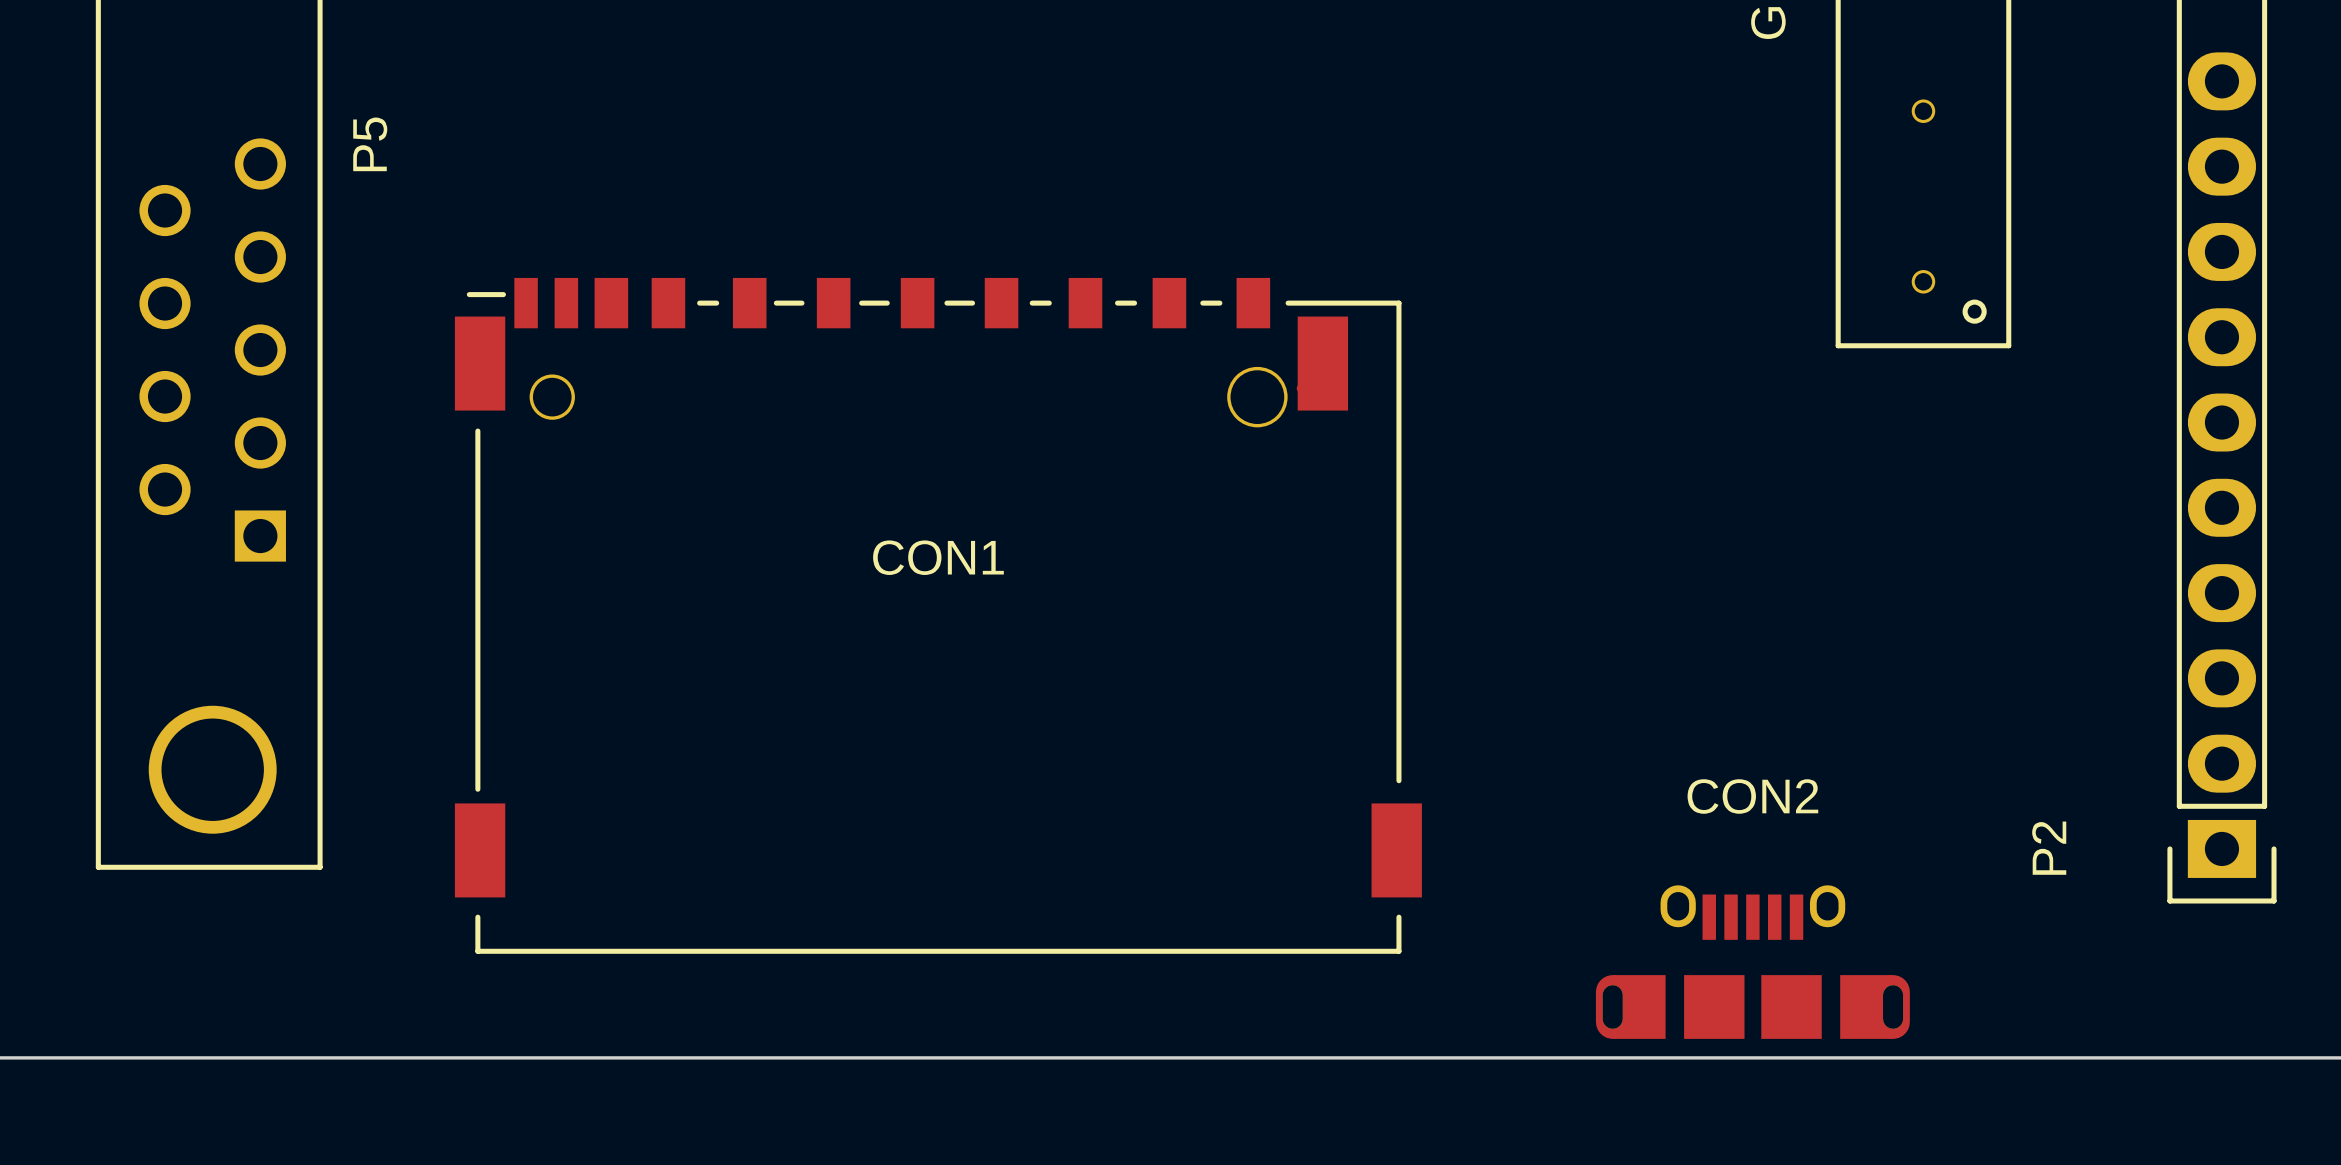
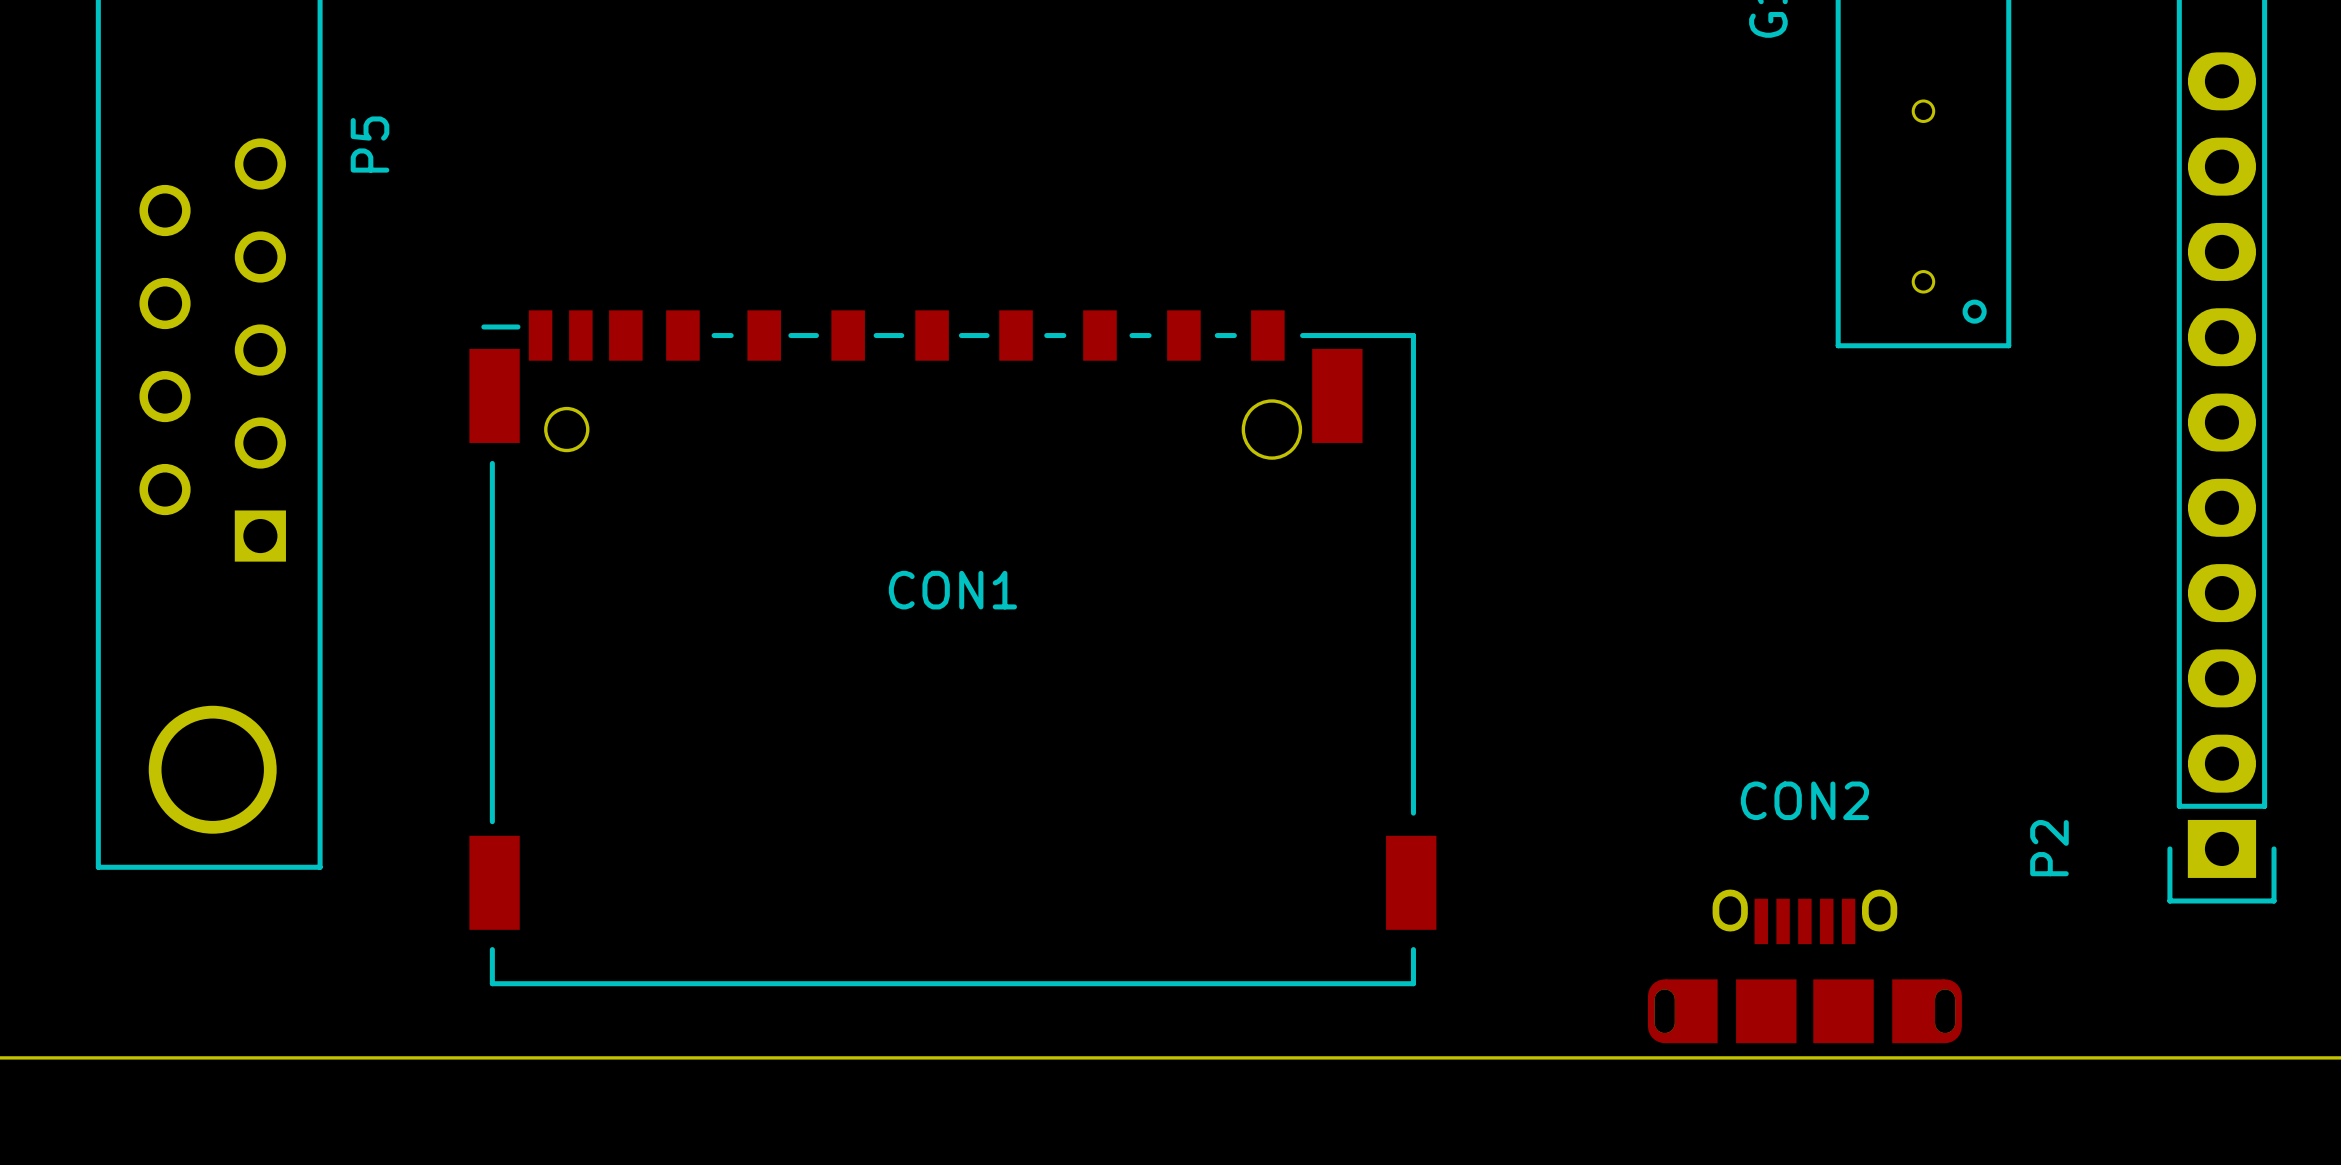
CON1 position: (938, 615) -> (952, 648)
CON2 position: (1752, 962) -> (1804, 966)

